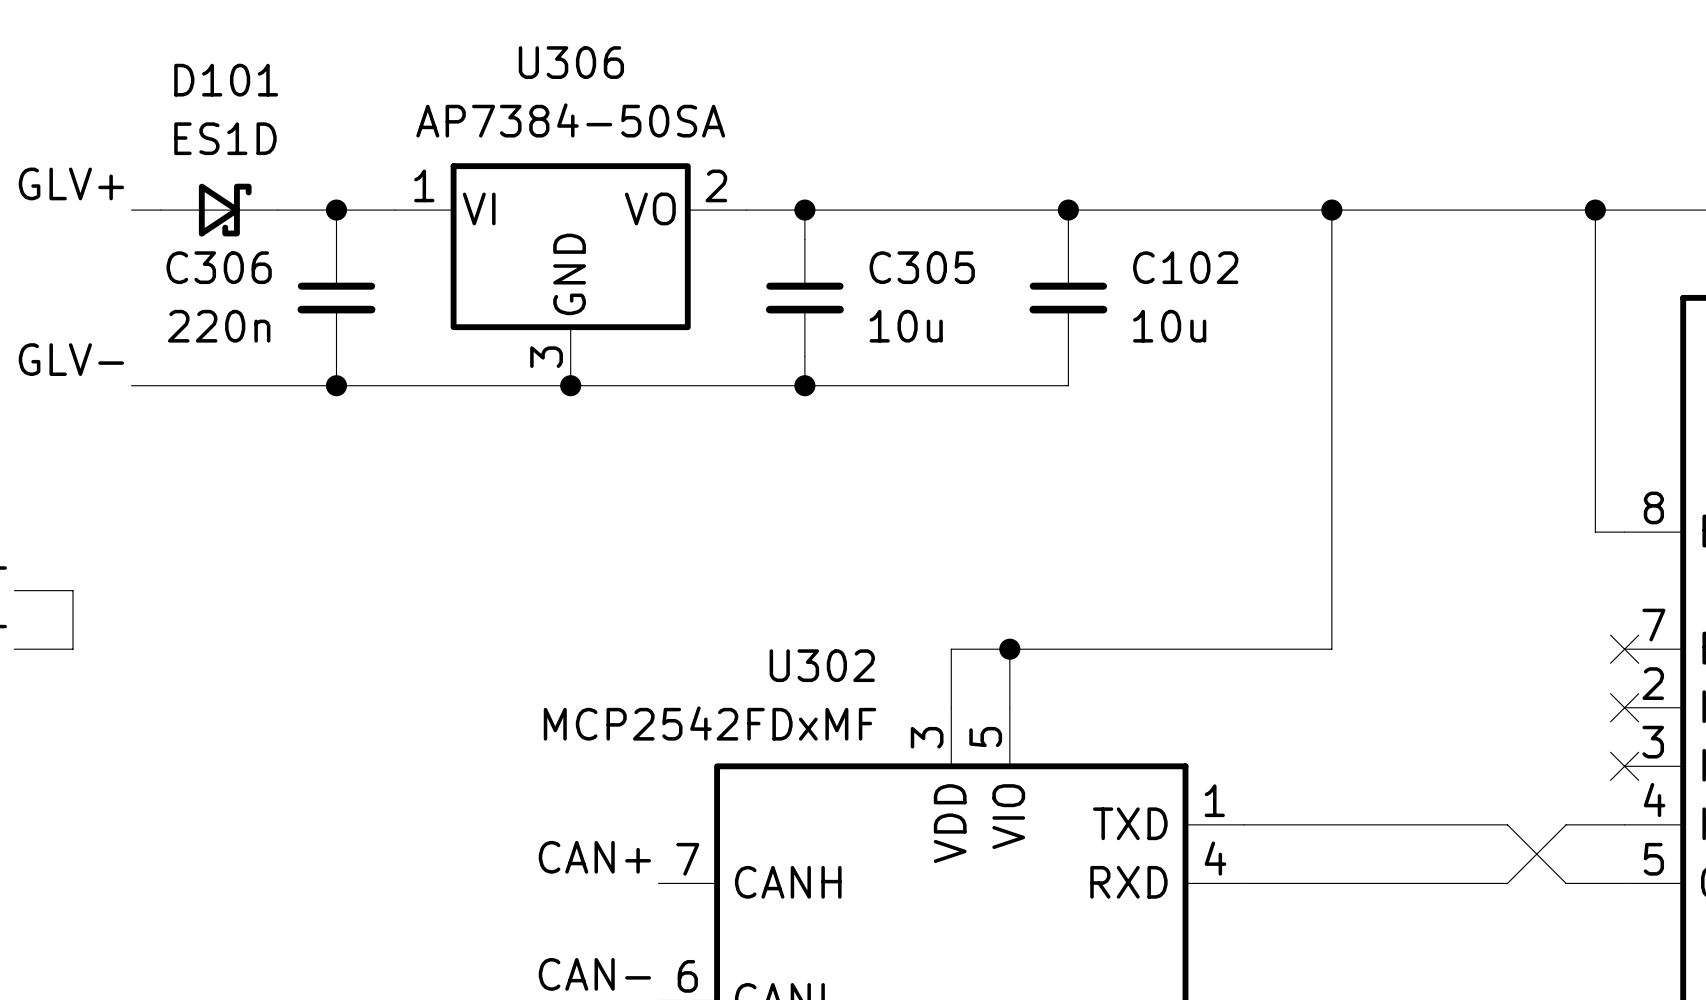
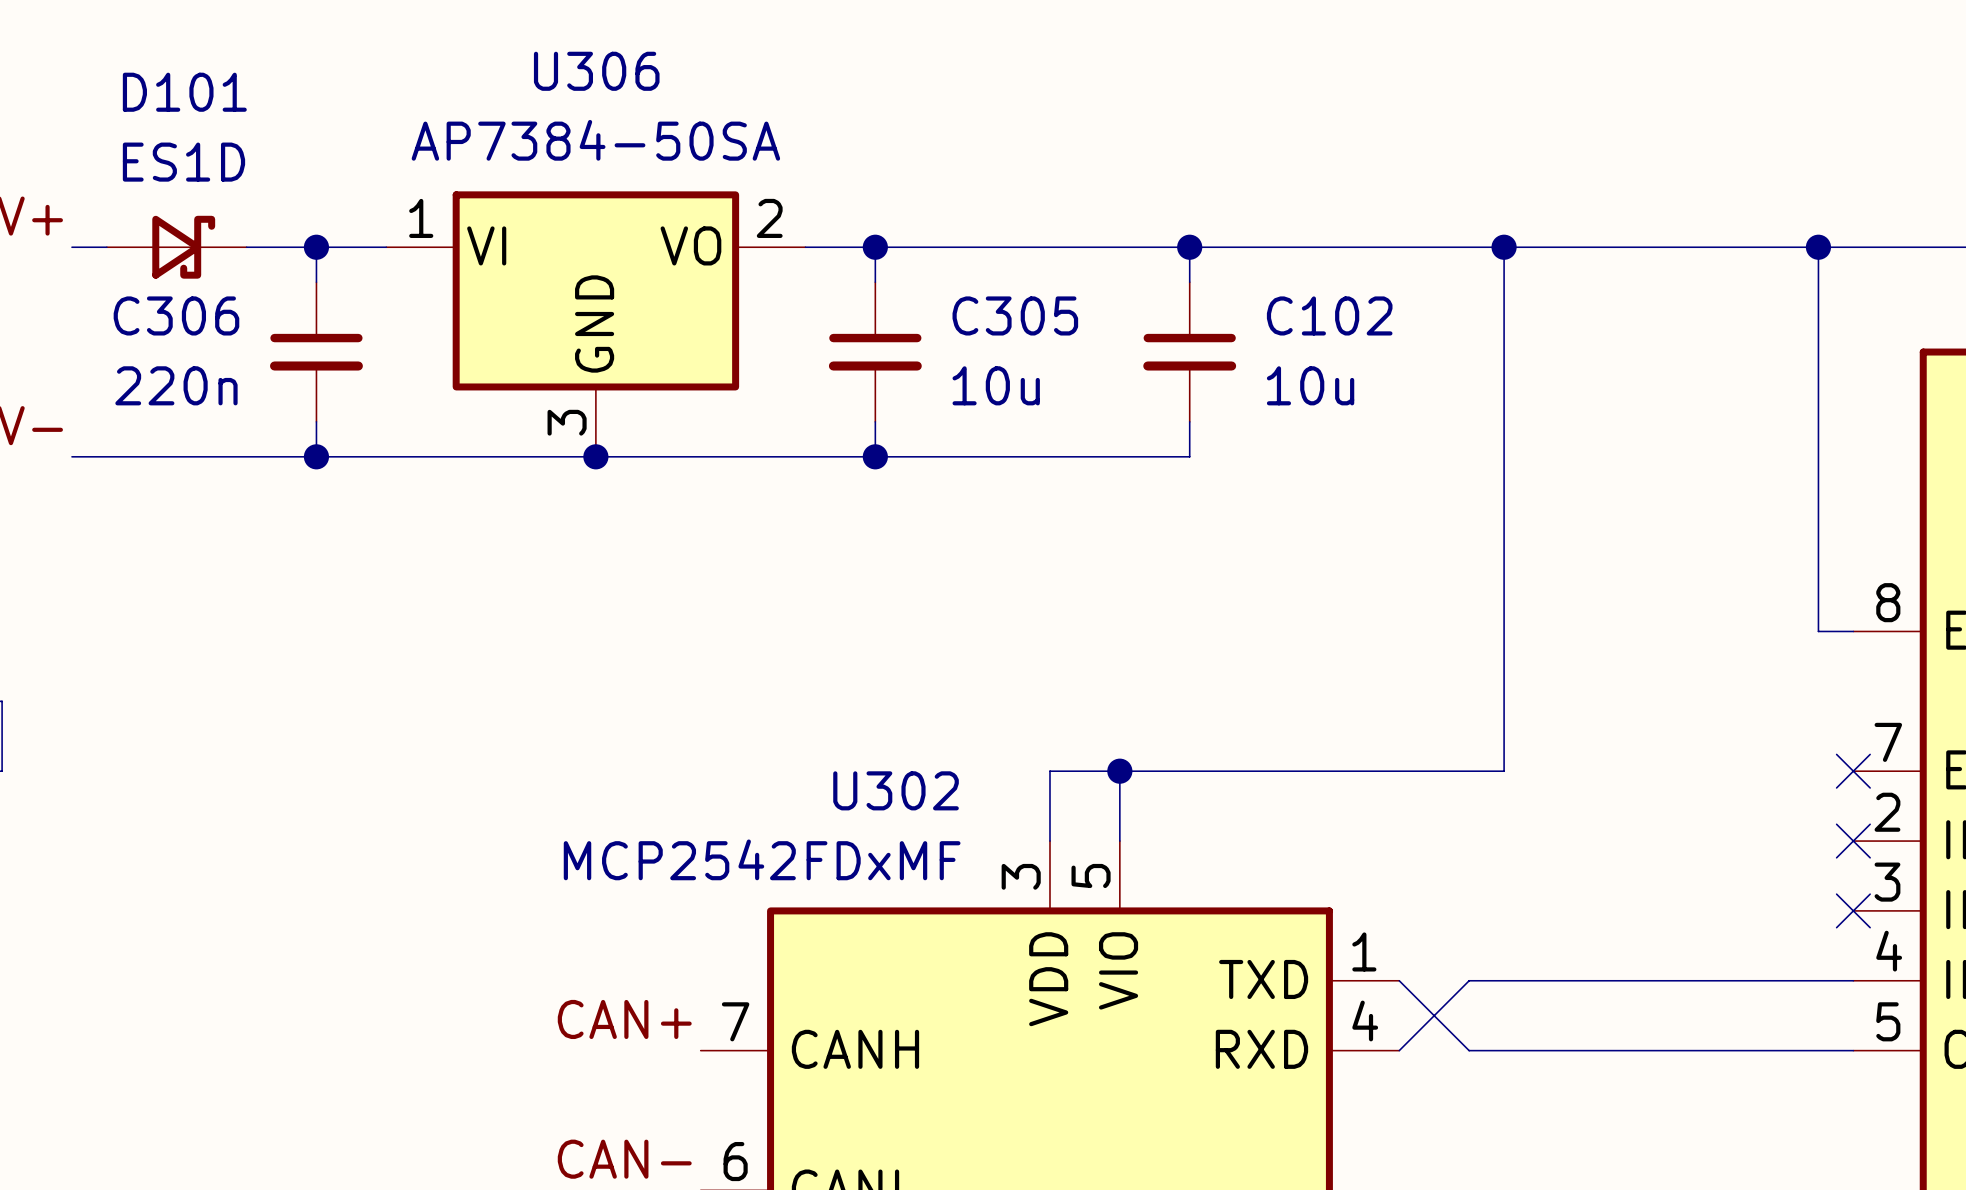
wire: (1244, 824) (1302, 824) -> (1399, 980) (1469, 1050)
wire: (1507, 824) (1566, 883) -> (1713, 980) (1783, 980)
wire: (1566, 824) (1507, 883) -> (1783, 1050) (1713, 1050)
wire: (1244, 883) (1302, 883) -> (1399, 1050) (1469, 980)

